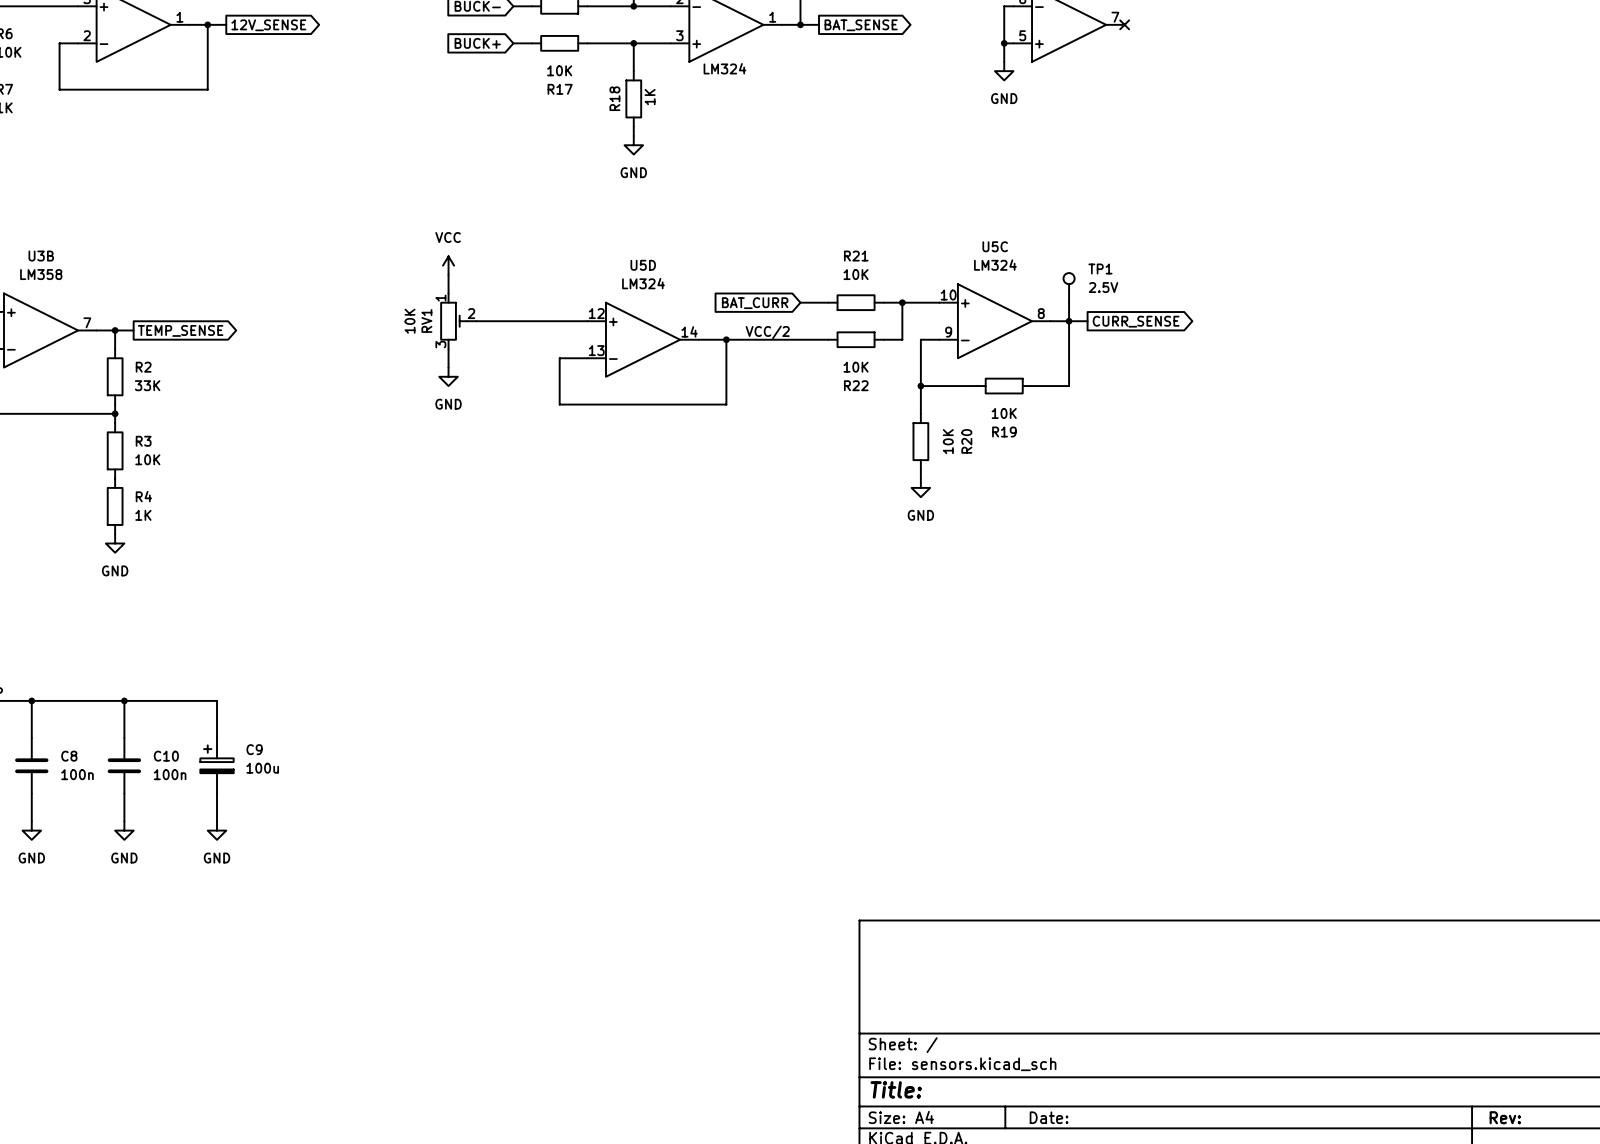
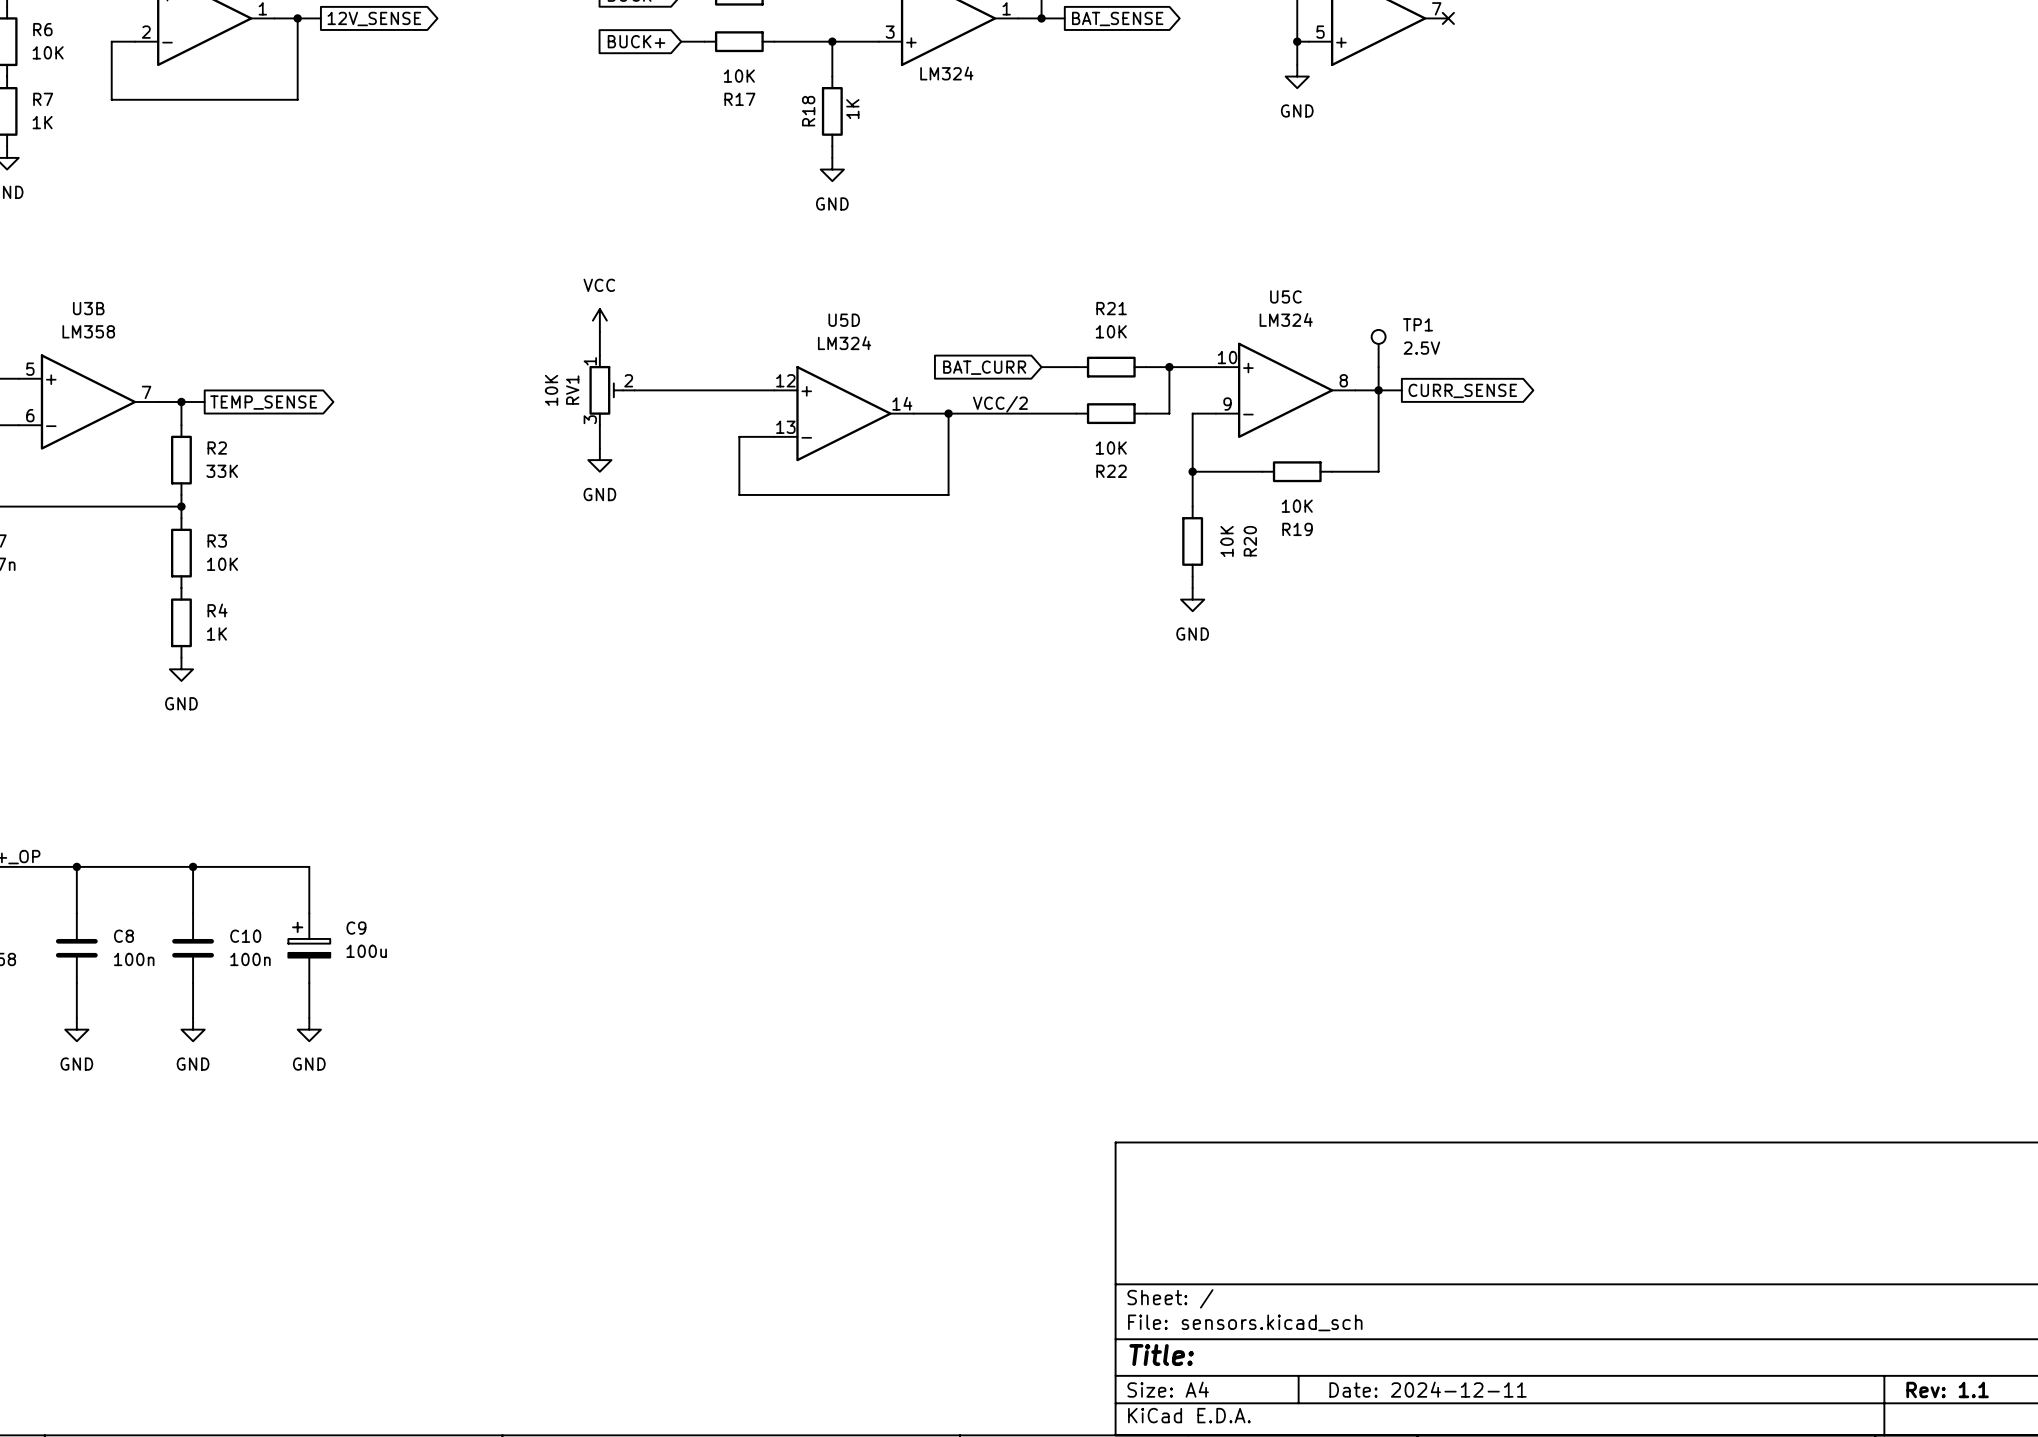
title block: Date: (1049, 1117) -> Date: 2024-12-11 (1428, 1389)
title block: Rev: (1505, 1117) -> Rev: 1.1 (1947, 1389)

